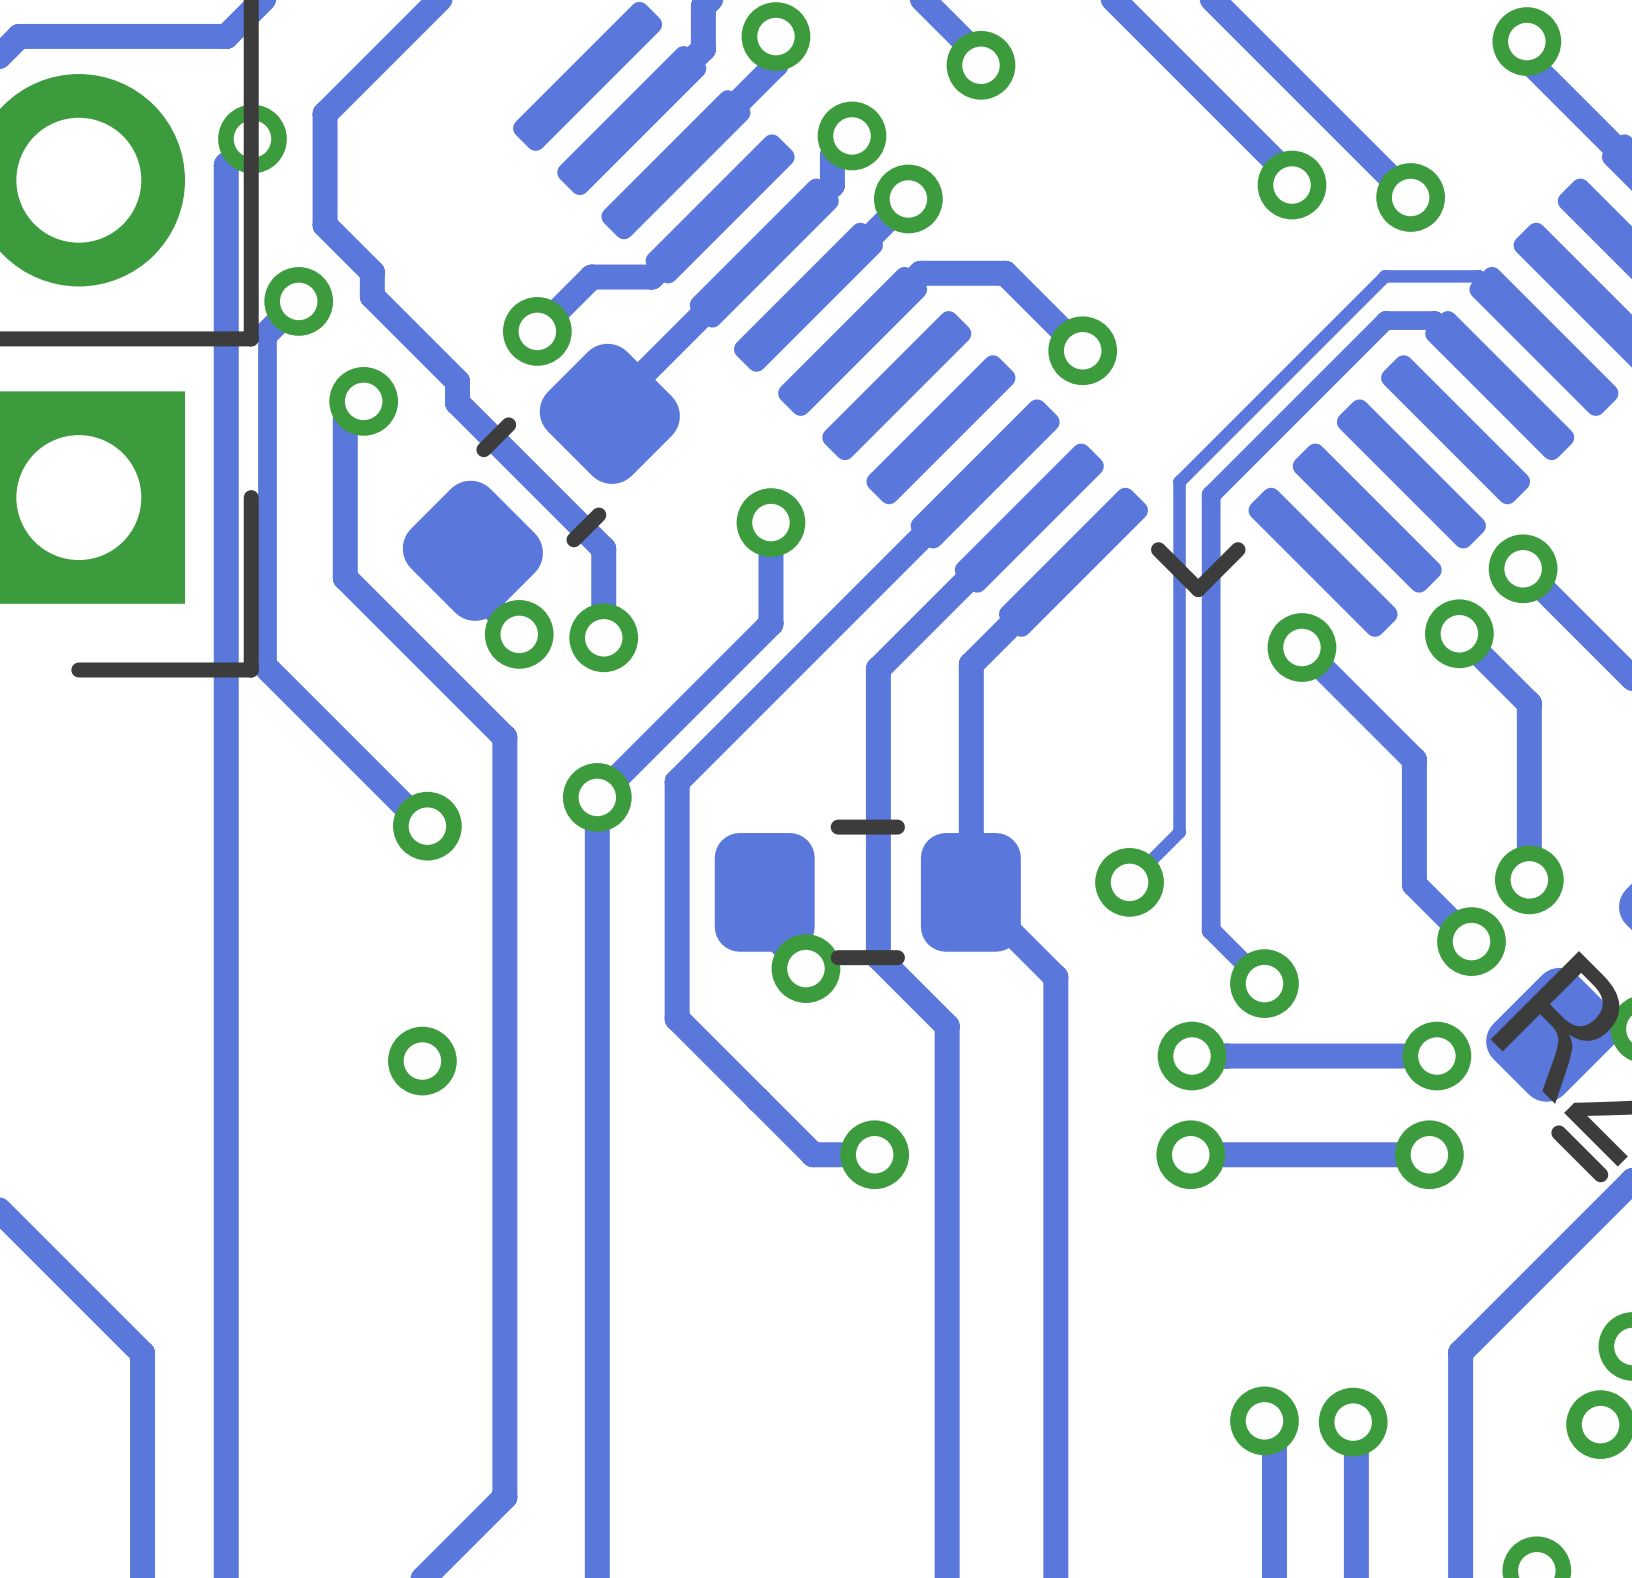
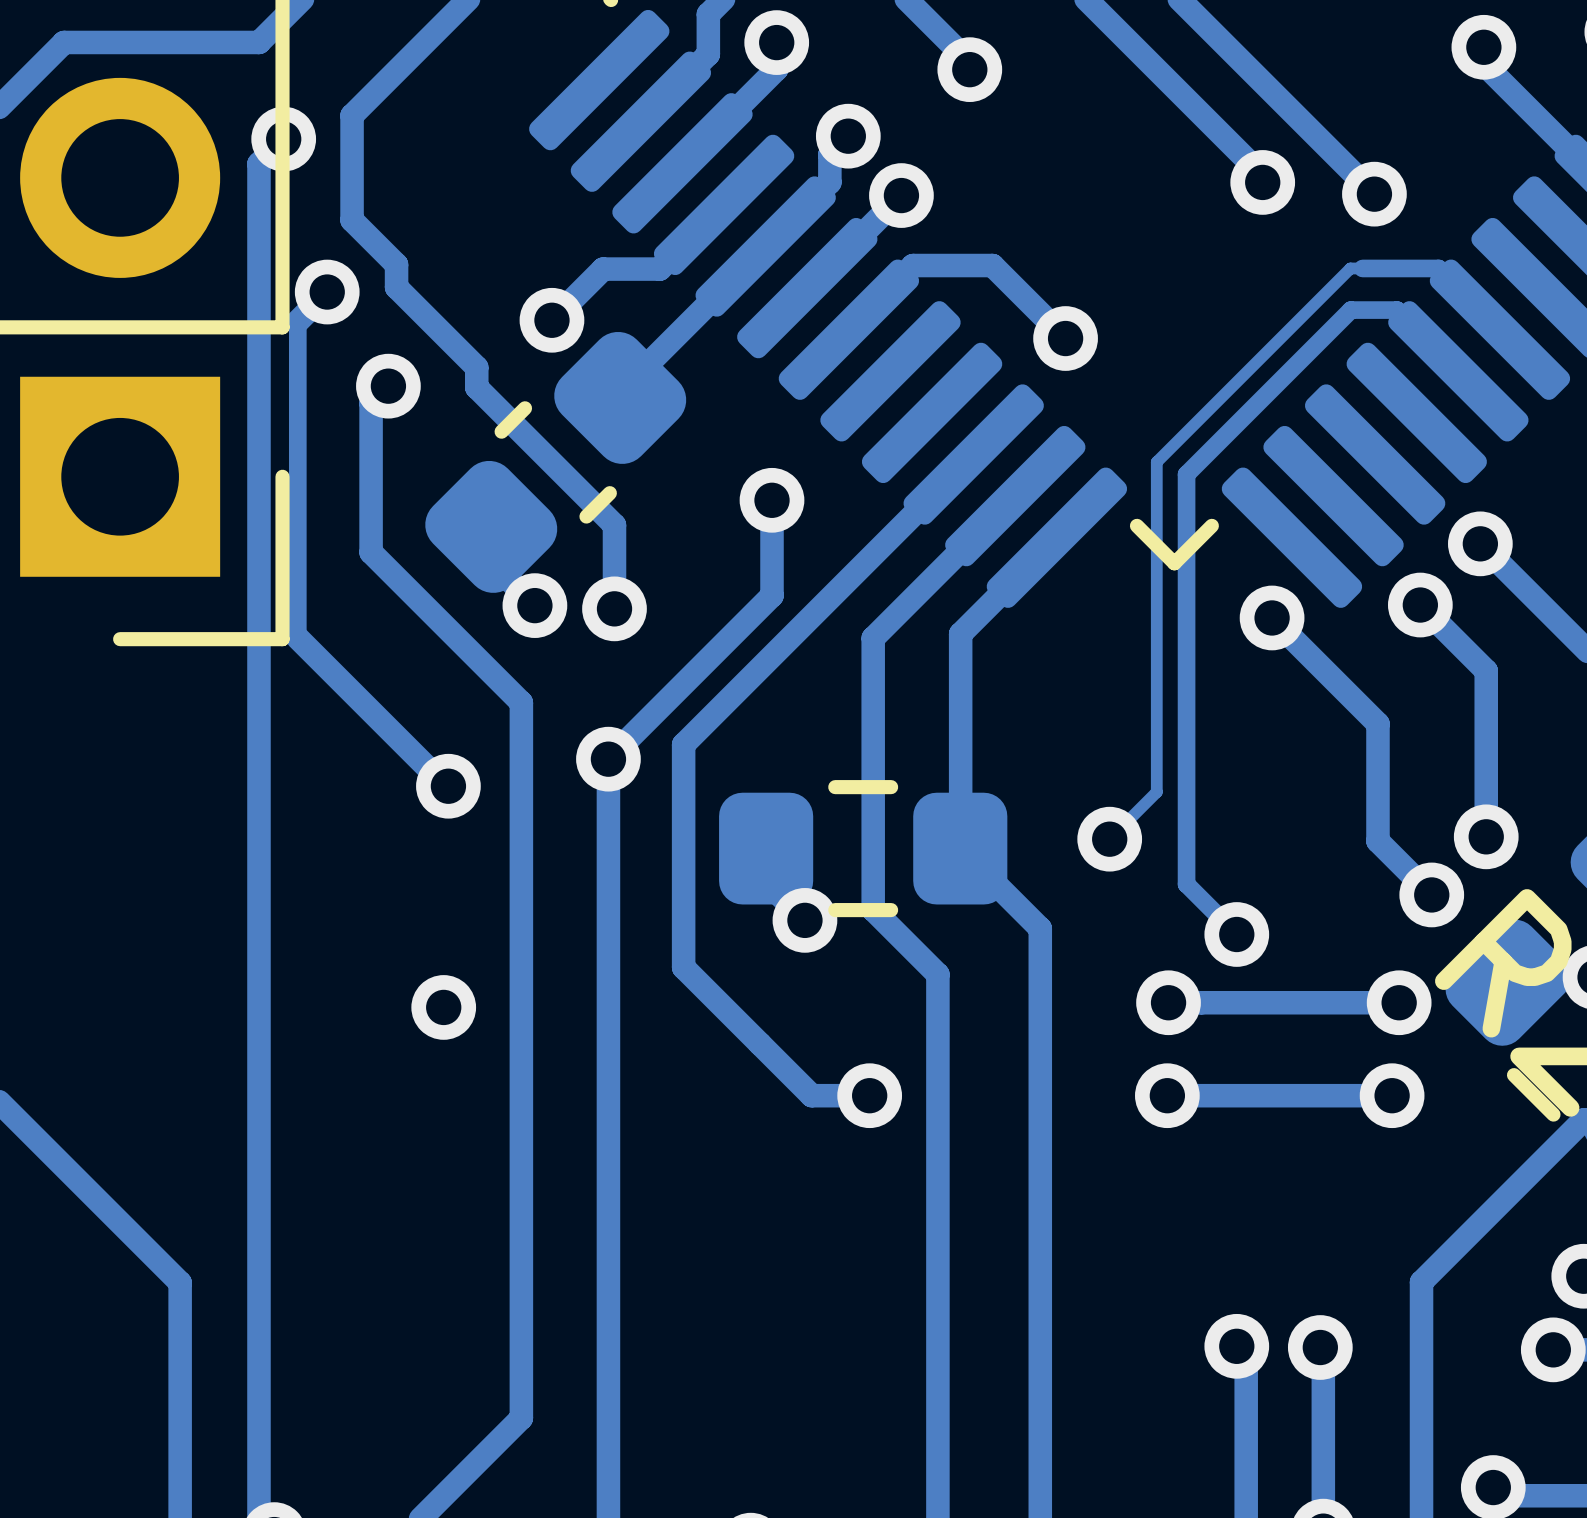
track width: thin (1398, 276) (1478, 276) (1543, 341) -> thick (1362, 268) (1438, 268) (1499, 329)

